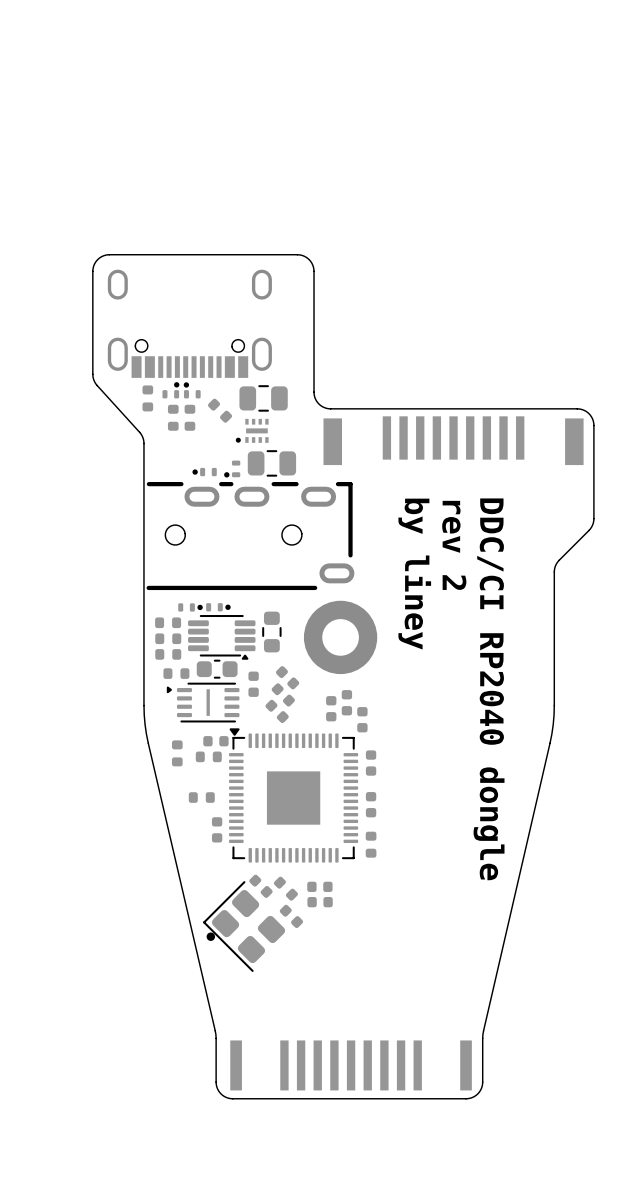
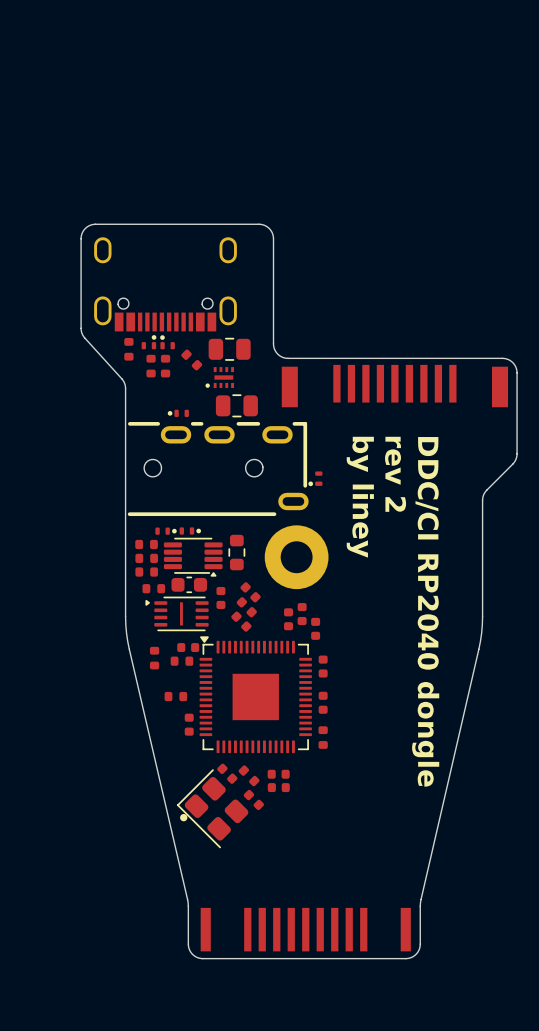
part position: (232, 469) -> (315, 478)

